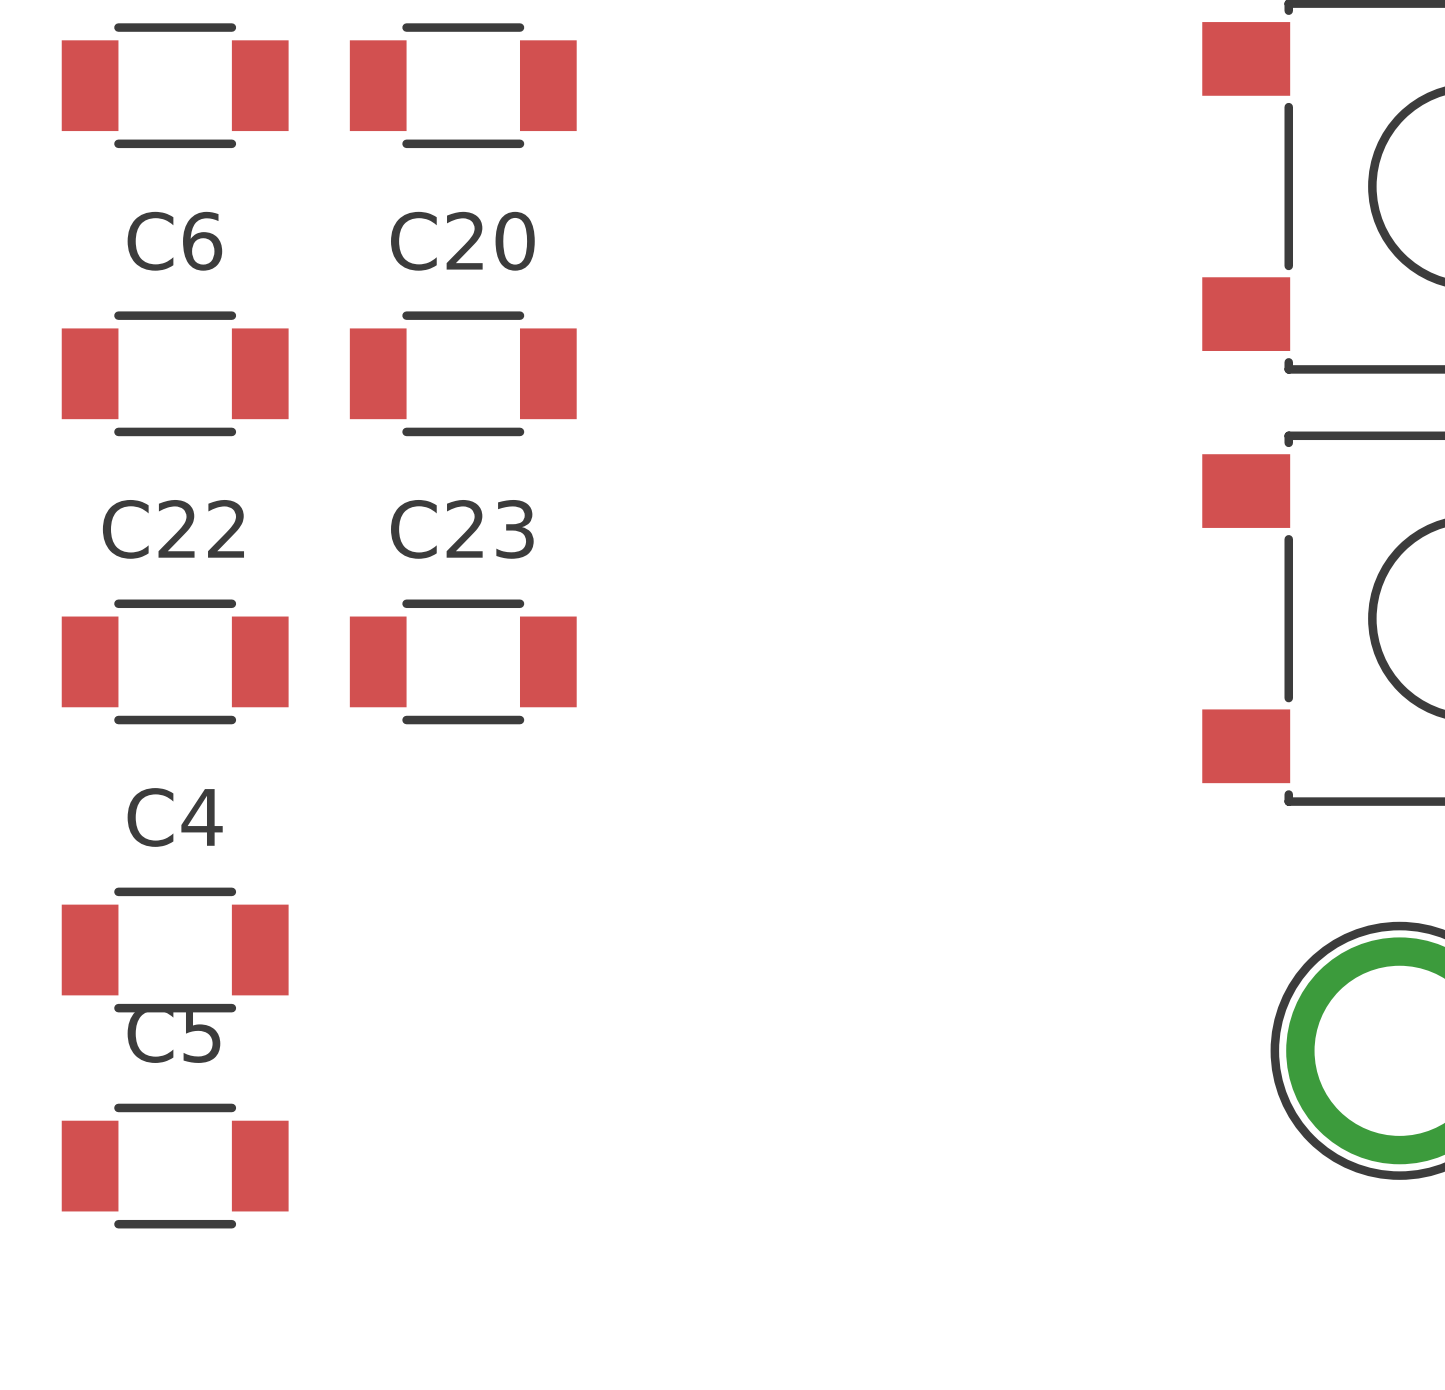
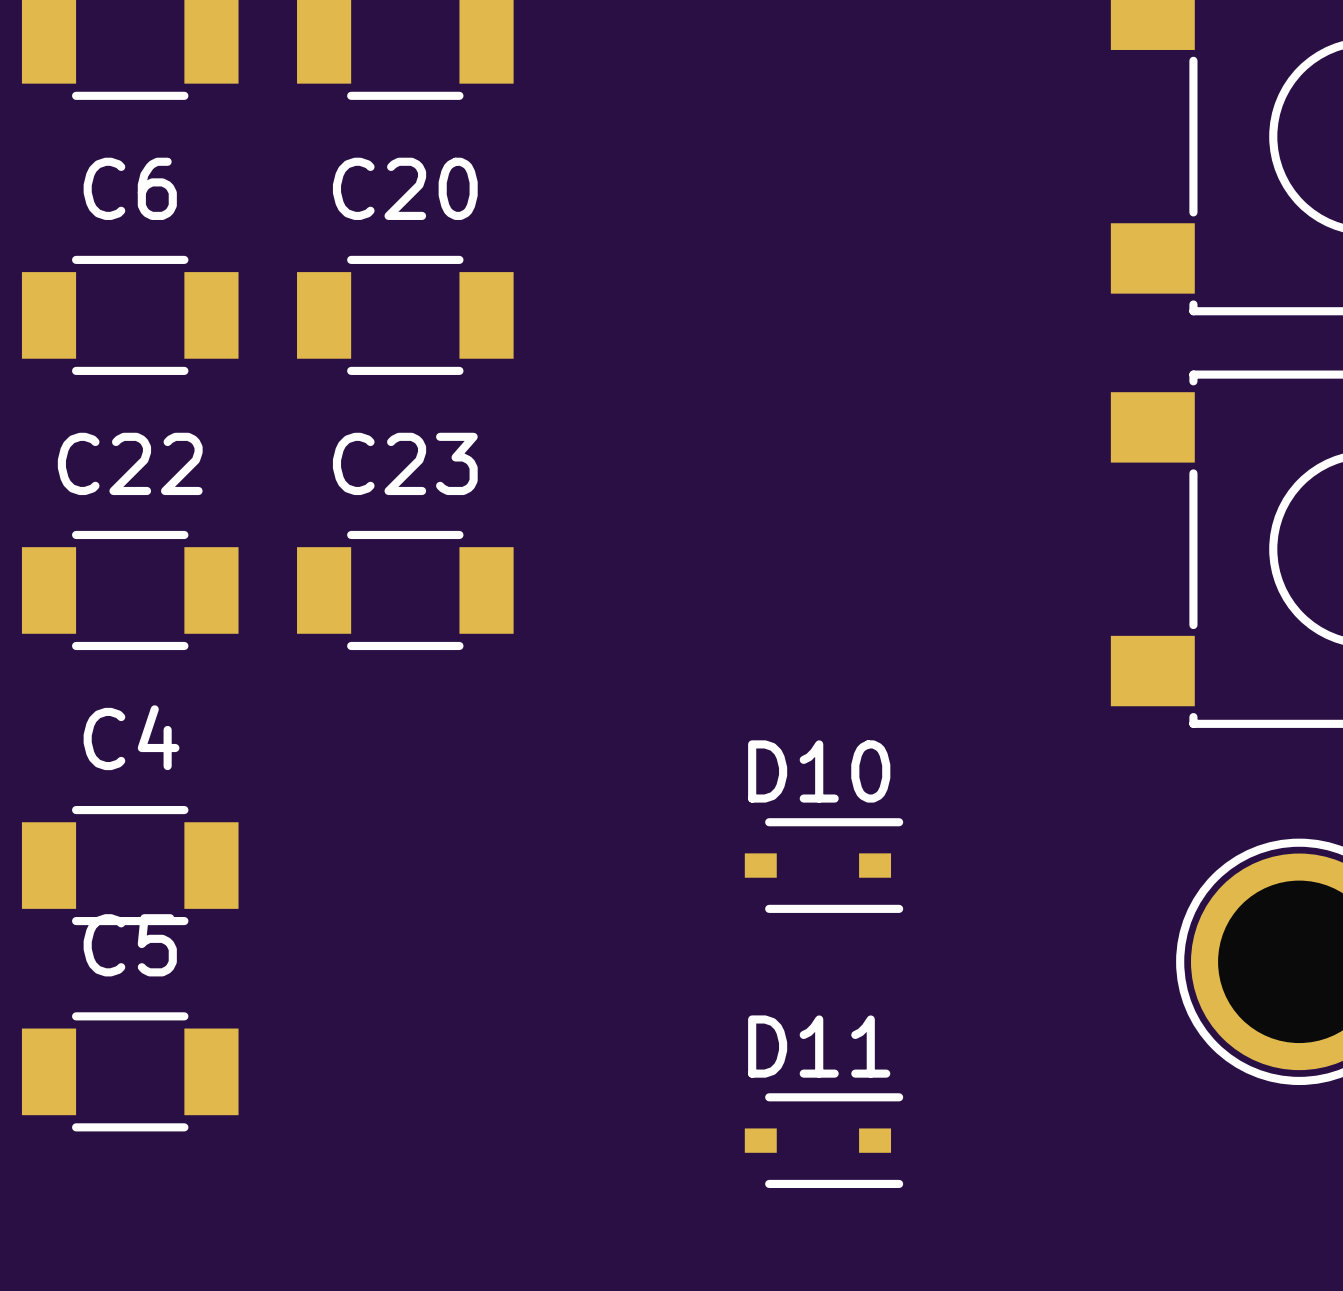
D10: none -> (824, 865)
D11: none -> (824, 1140)

